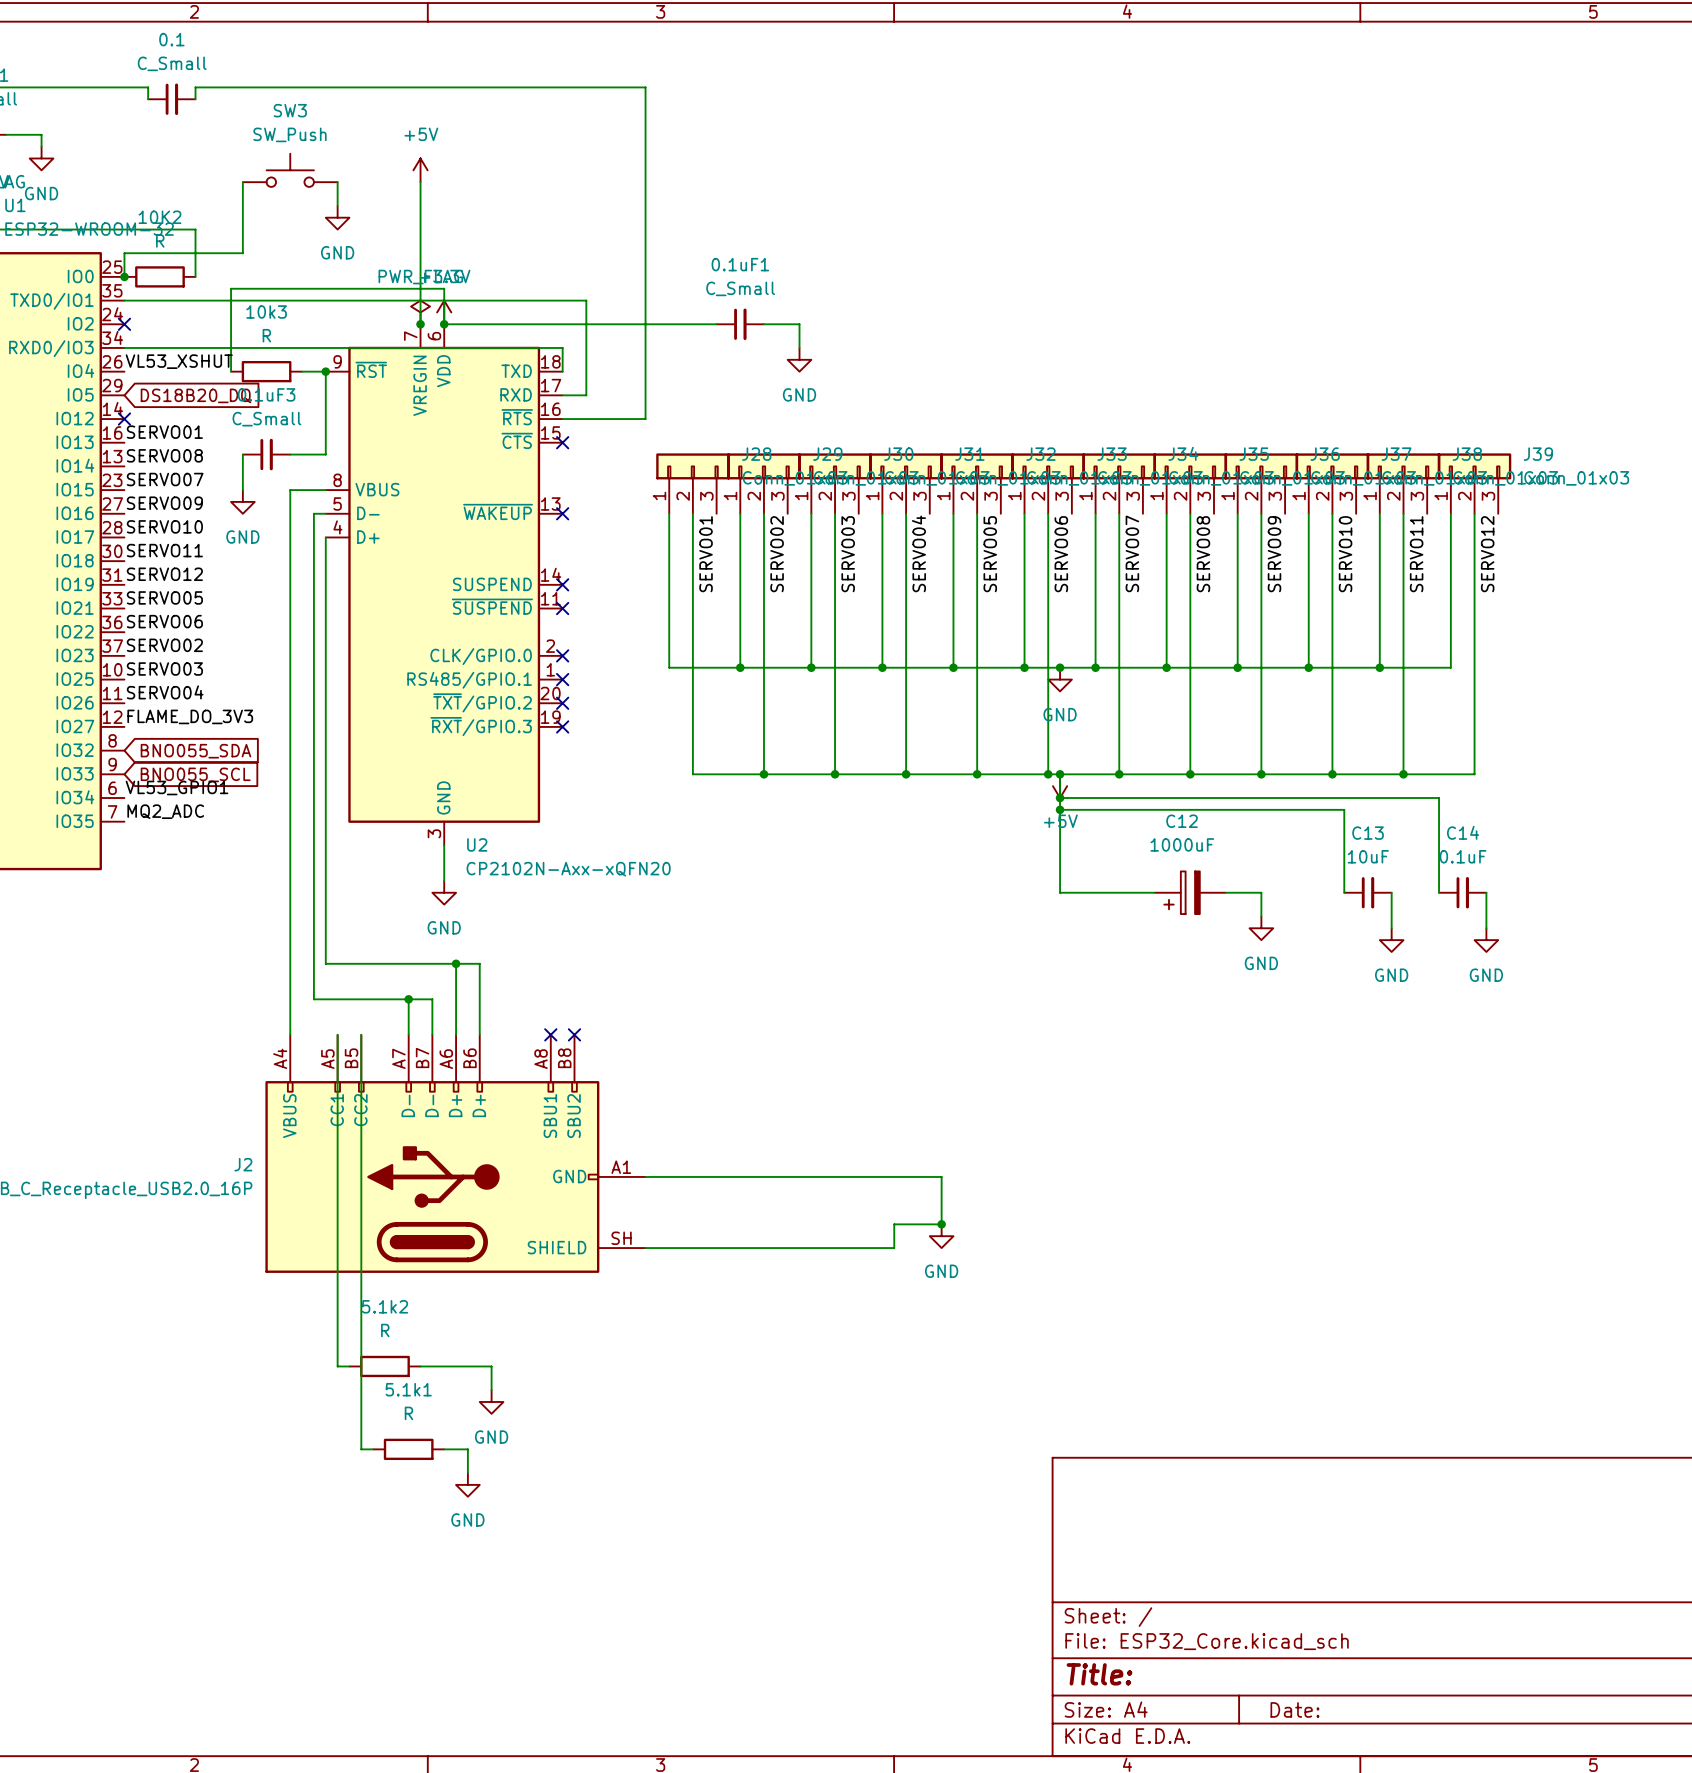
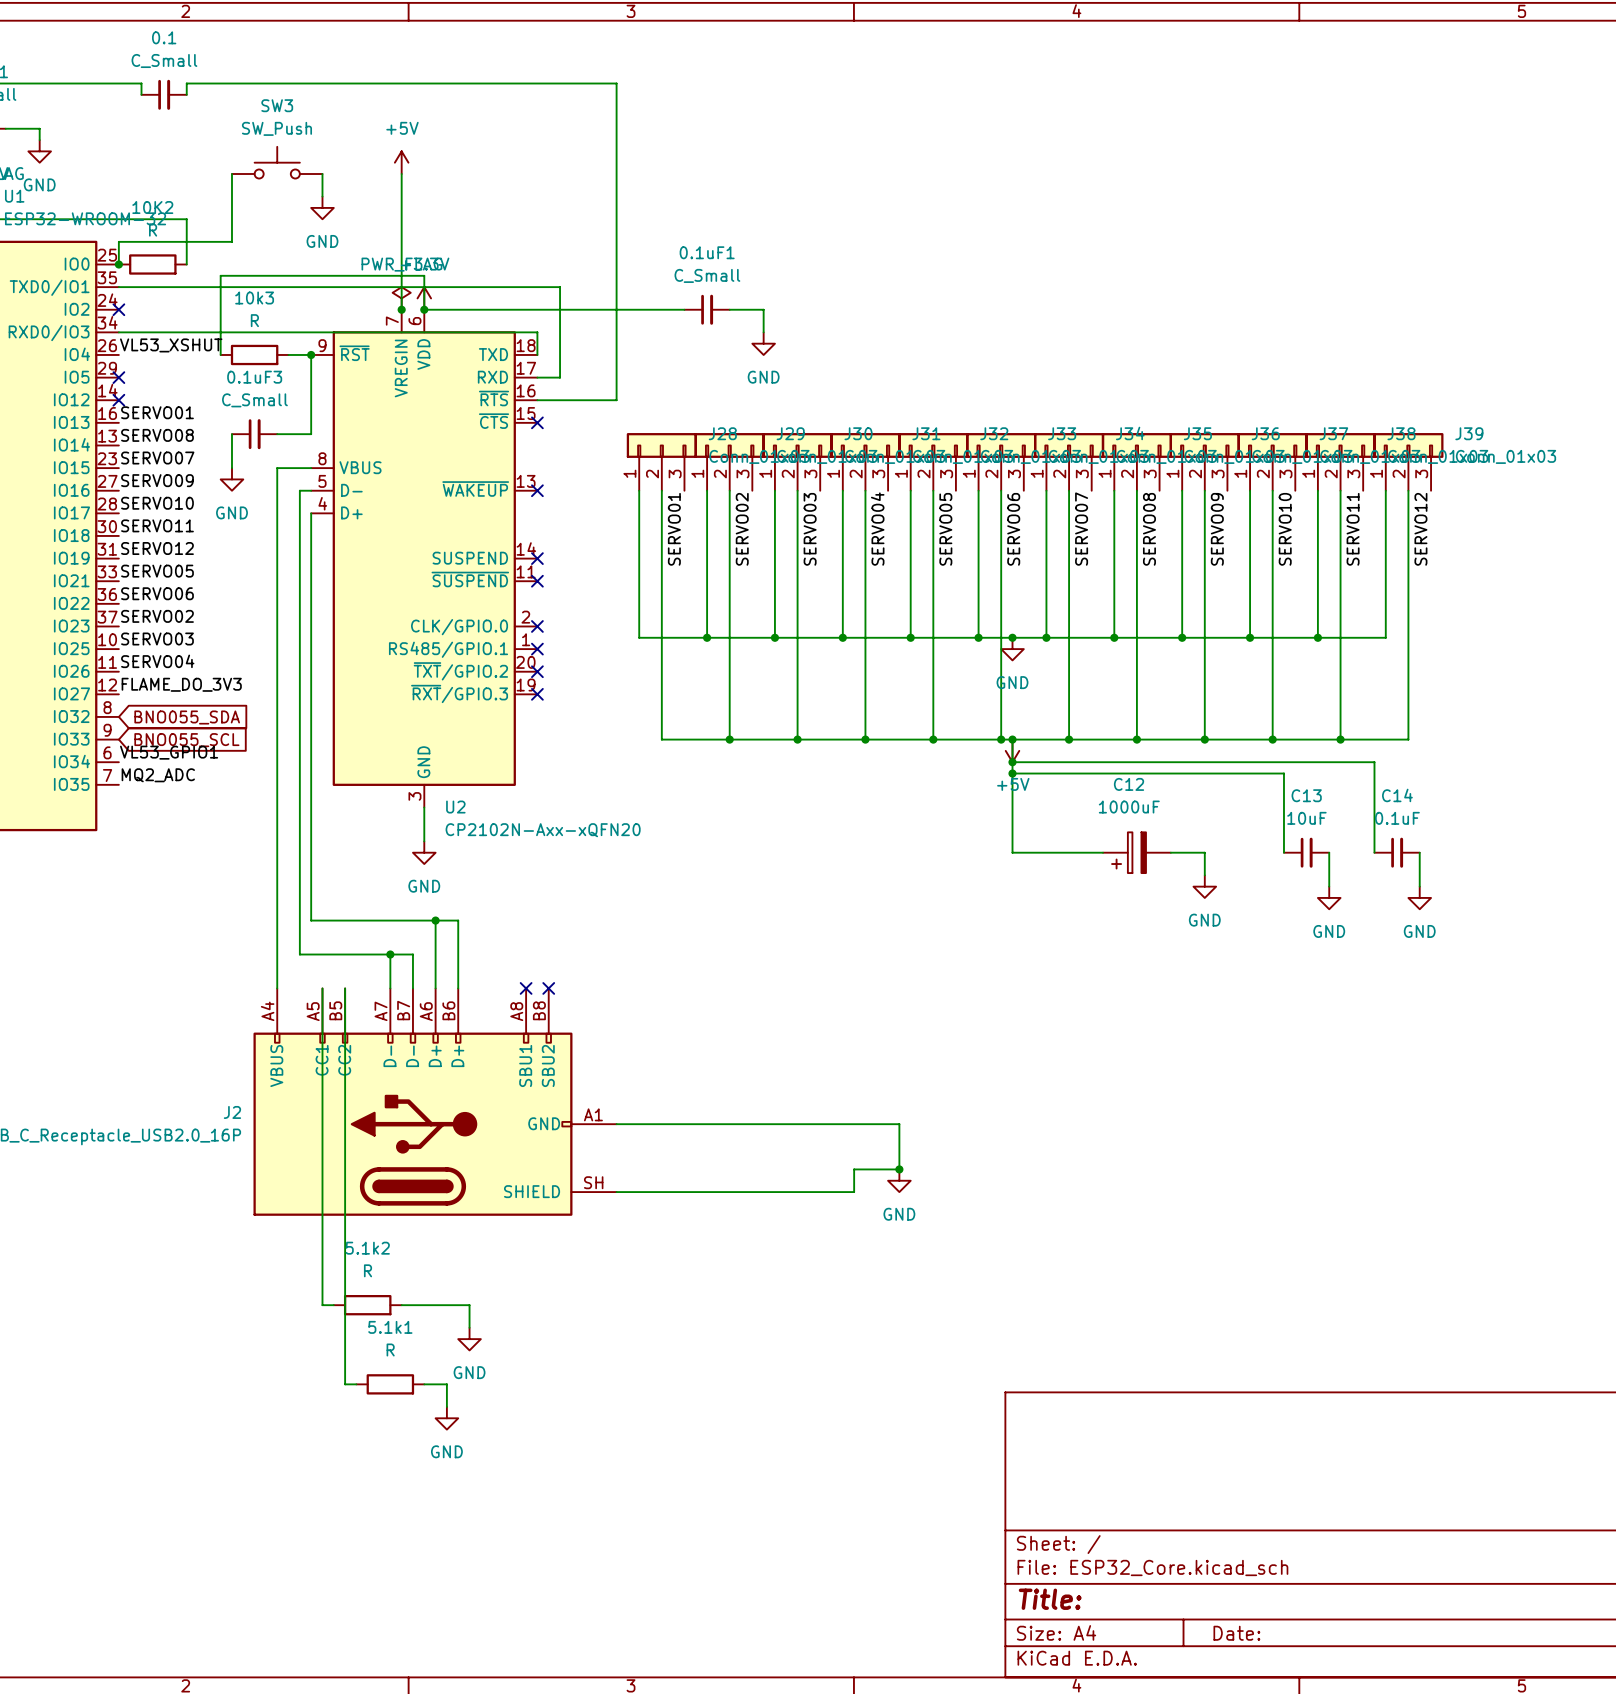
no-connect mark: none -> (118, 377)
global label: DS18B20_DQ (195, 395) -> none

